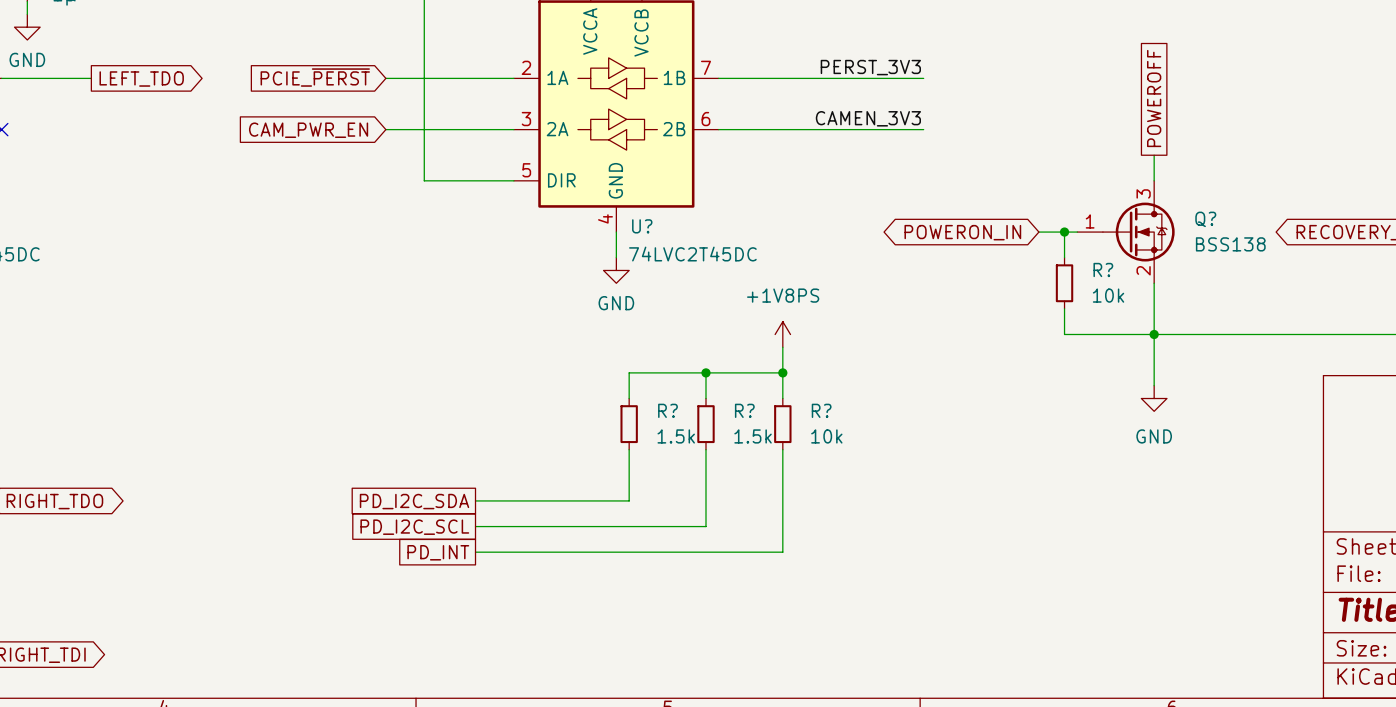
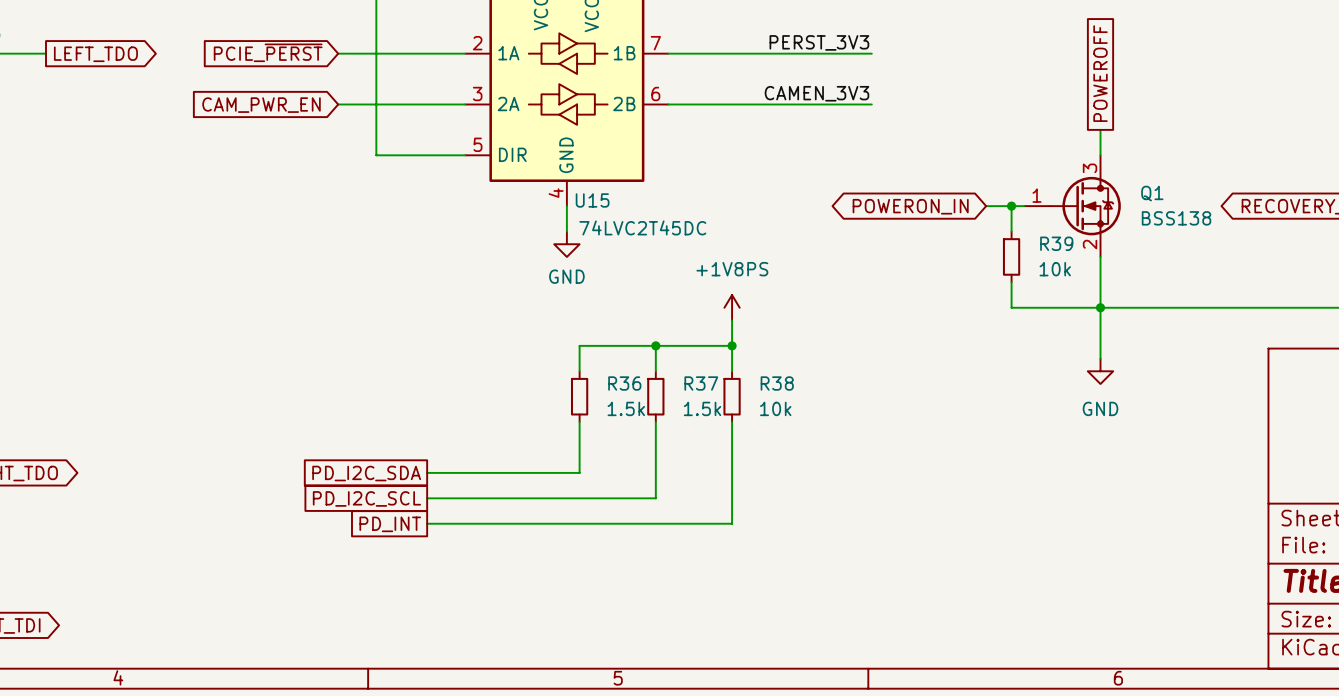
Q? name: Q? (1205, 219) -> Q1 (1152, 193)
U? name: U? (642, 226) -> U15 (592, 200)
R? name: R? (1103, 269) -> R39 (1056, 243)
R? name: R? (667, 410) -> R36 (624, 383)
R? name: R? (744, 410) -> R37 (701, 383)
R? name: R? (821, 410) -> R38 (777, 383)

